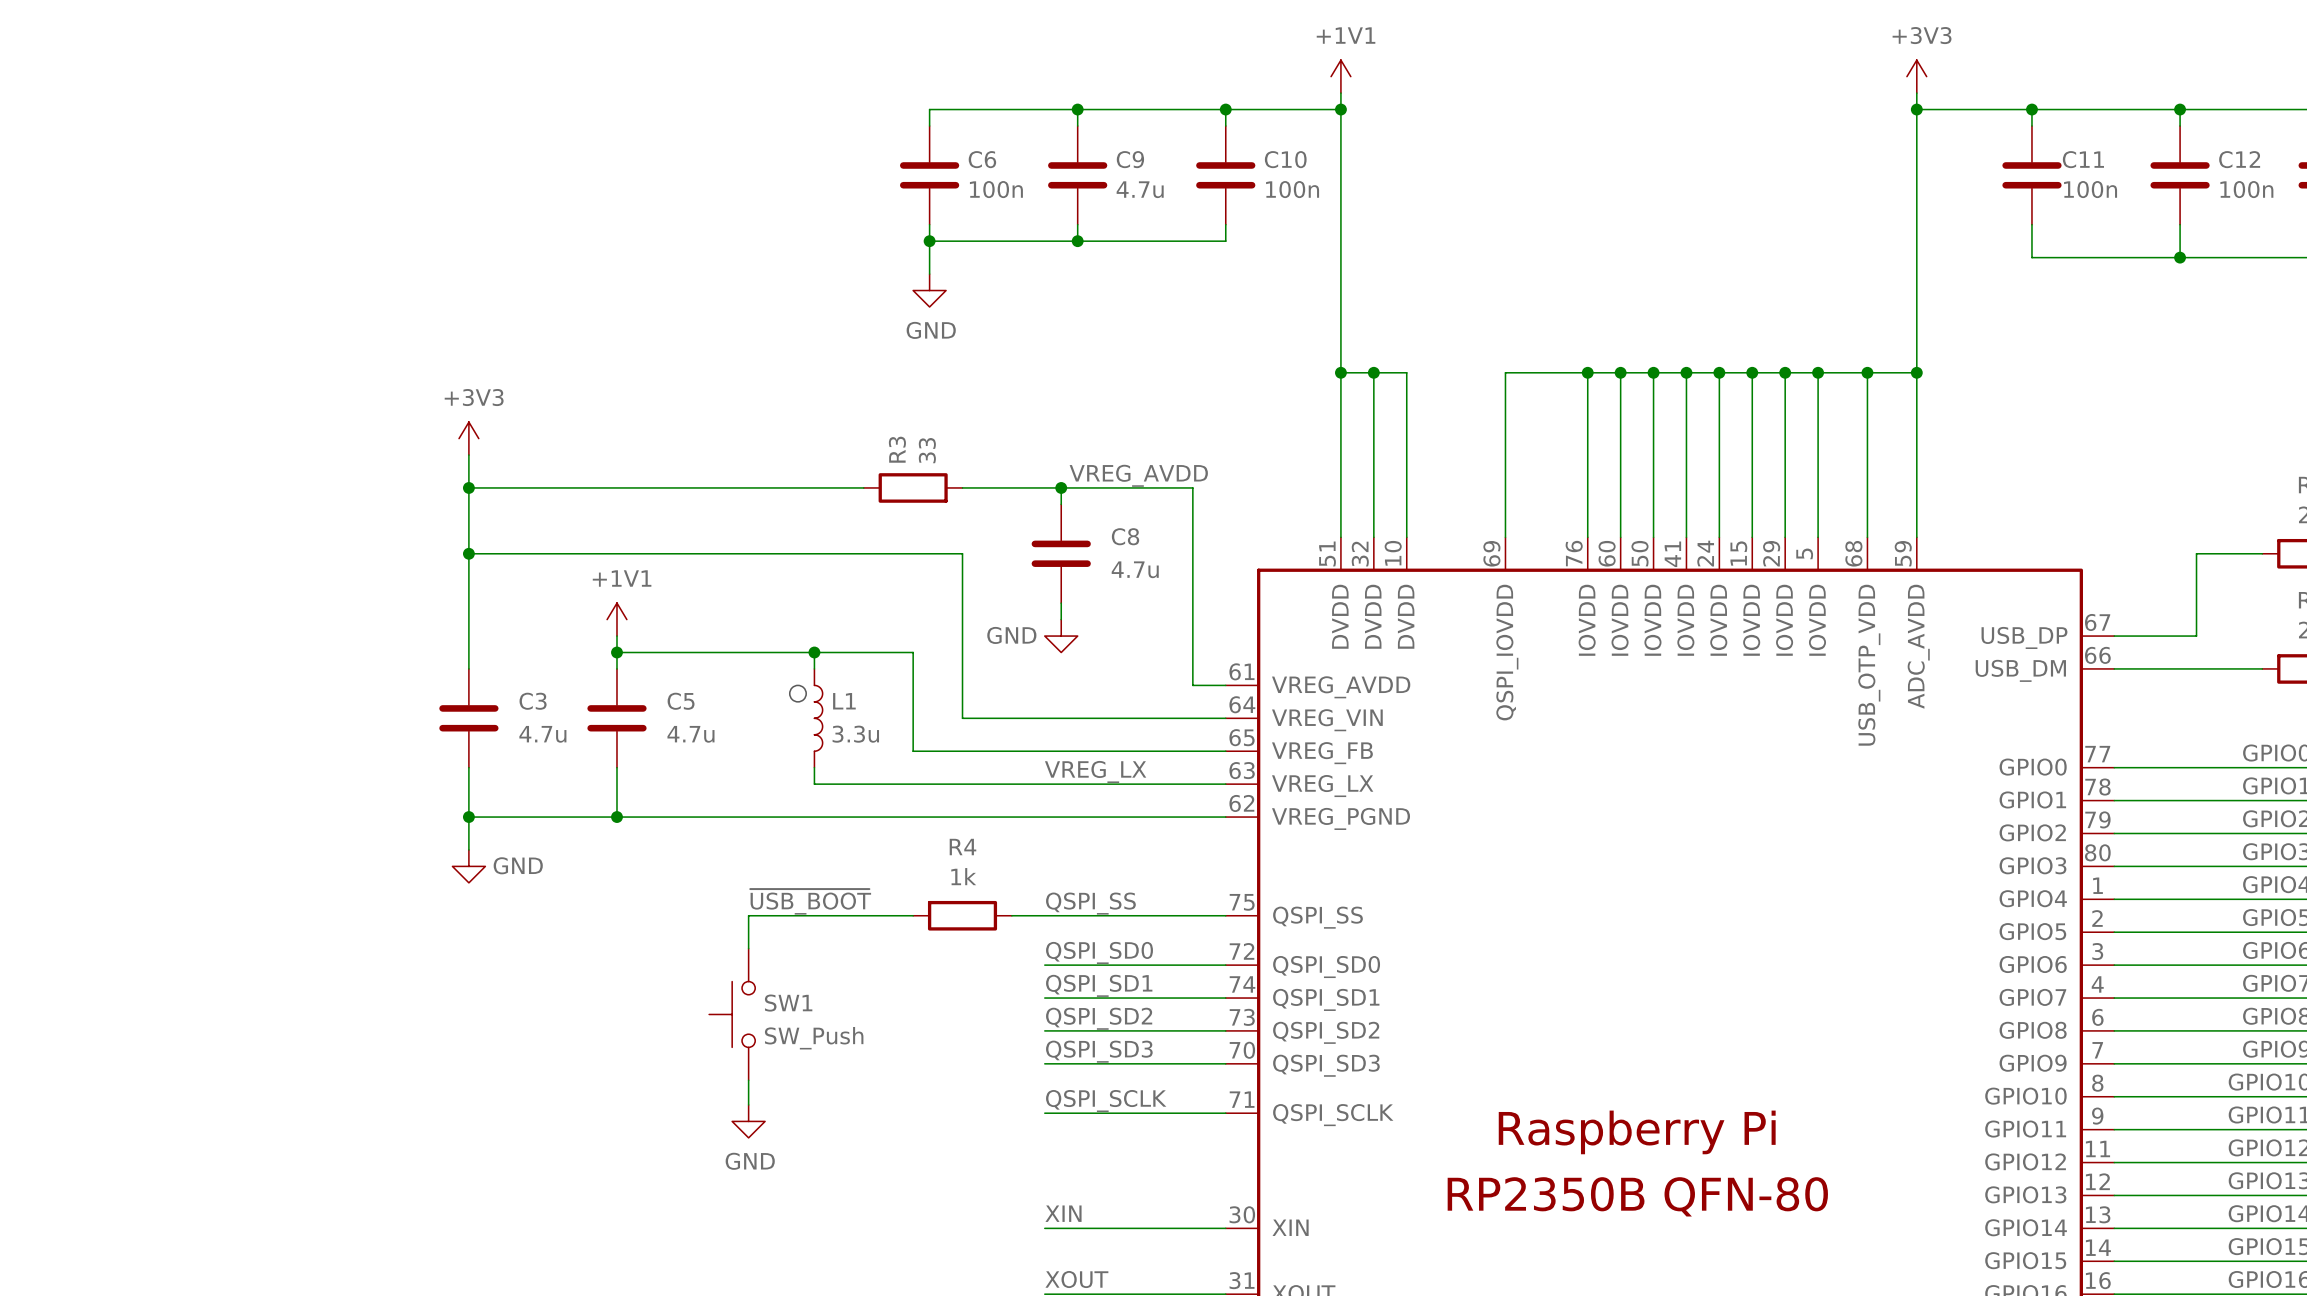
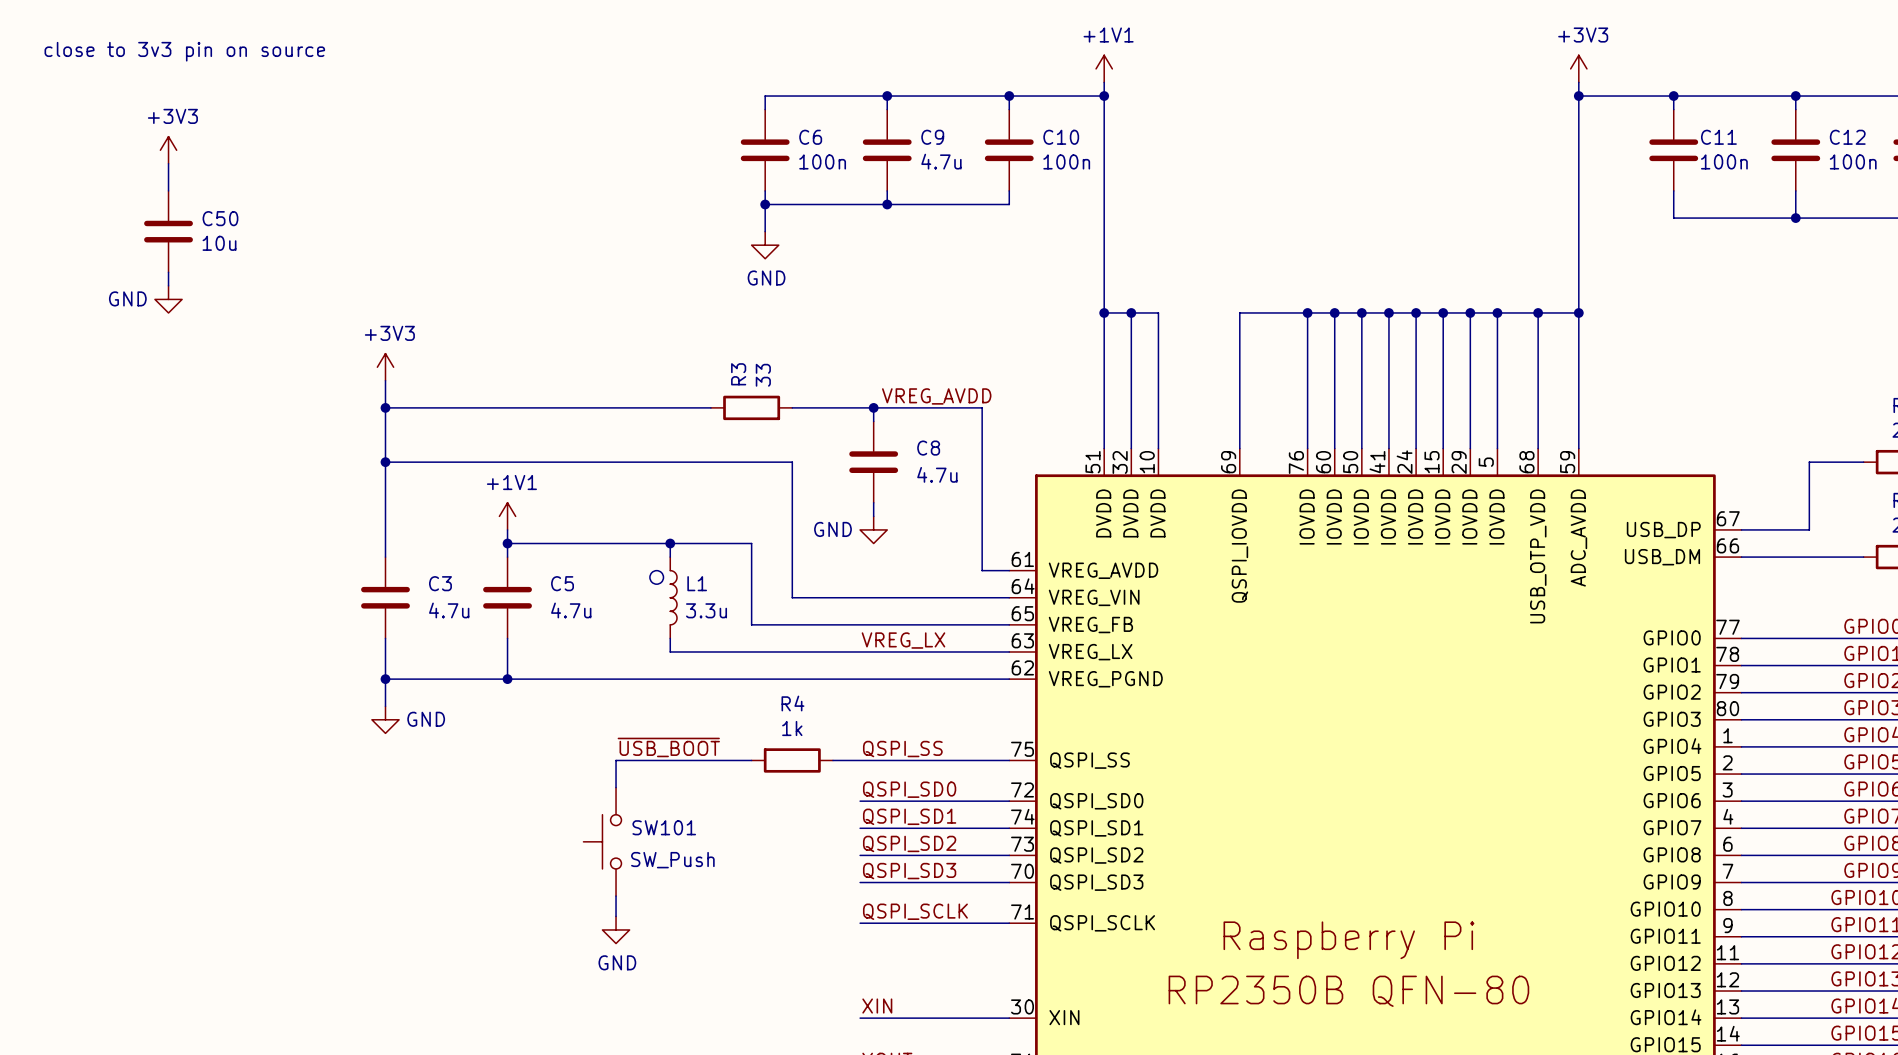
text: none -> close to 3v3 pin on source (184, 51)
power symbol: none -> +3V3 (168, 150)
wire: none -> (168, 163) (168, 190)
C50: none -> 10u (168, 231)
wire: none -> (168, 272) (168, 285)
power symbol: none -> GND (168, 299)
SW1 name: SW1 (788, 1003) -> SW101 (664, 827)

